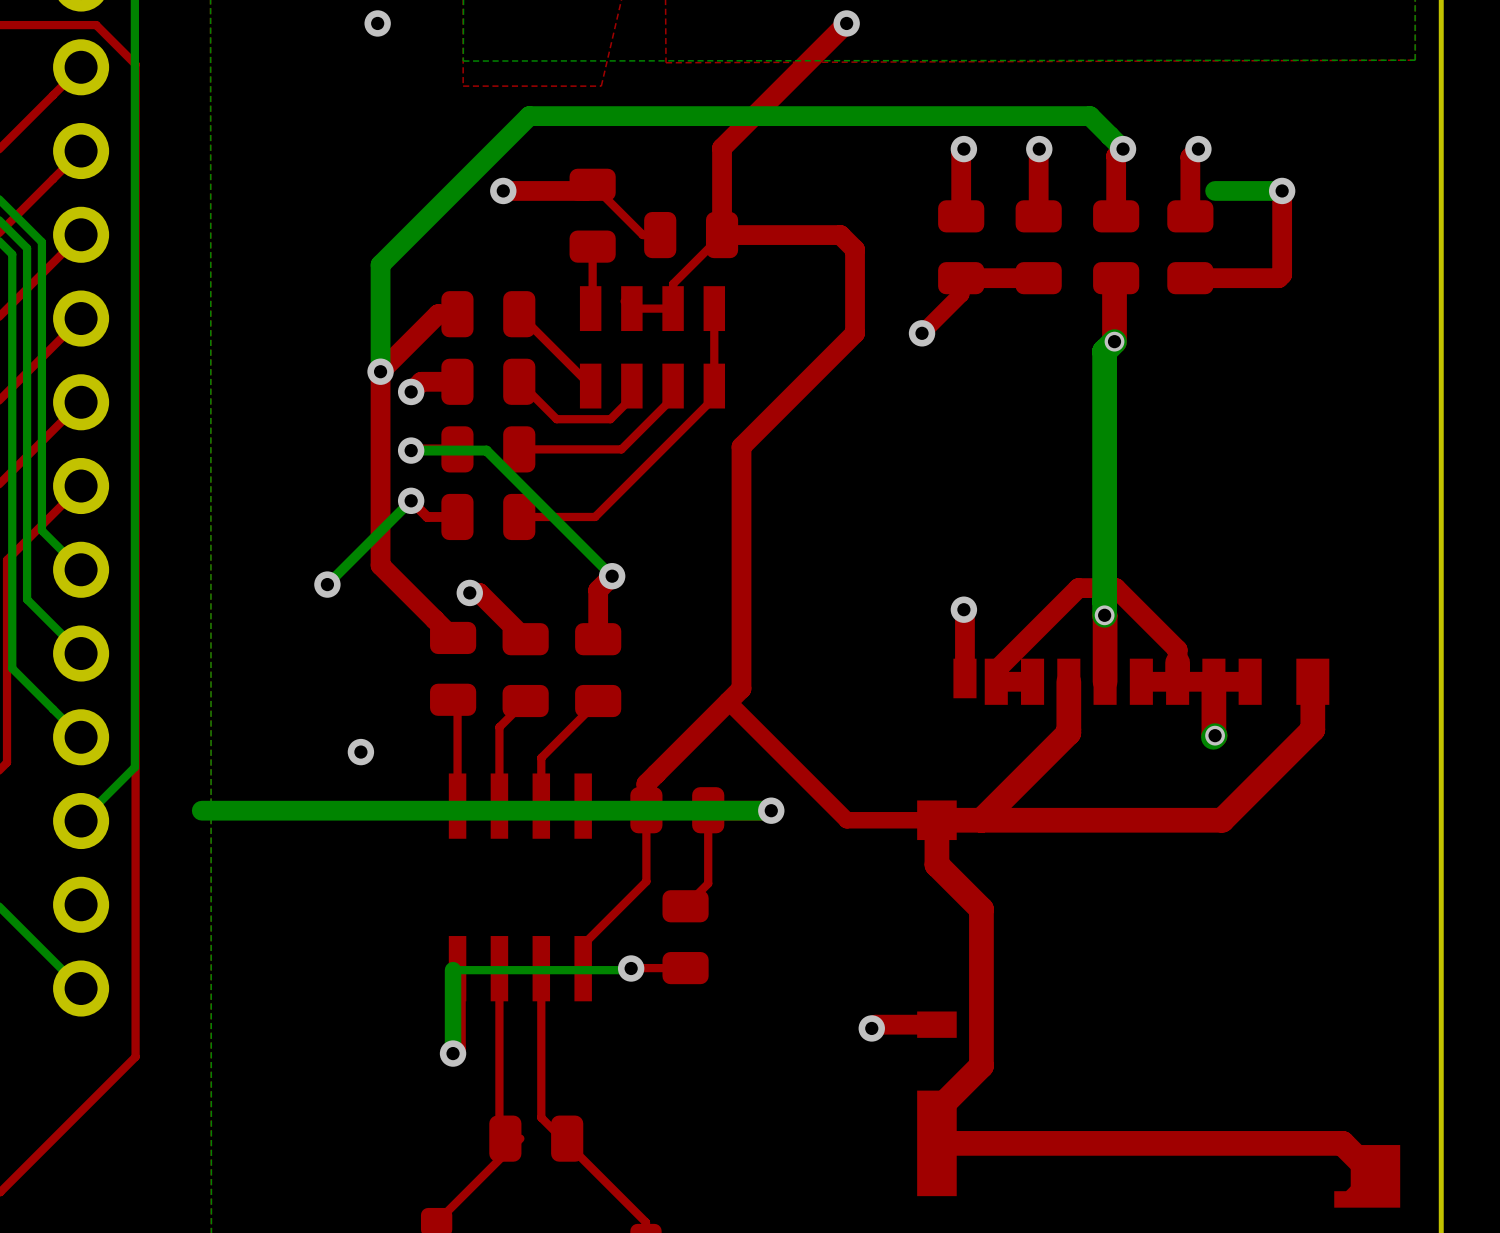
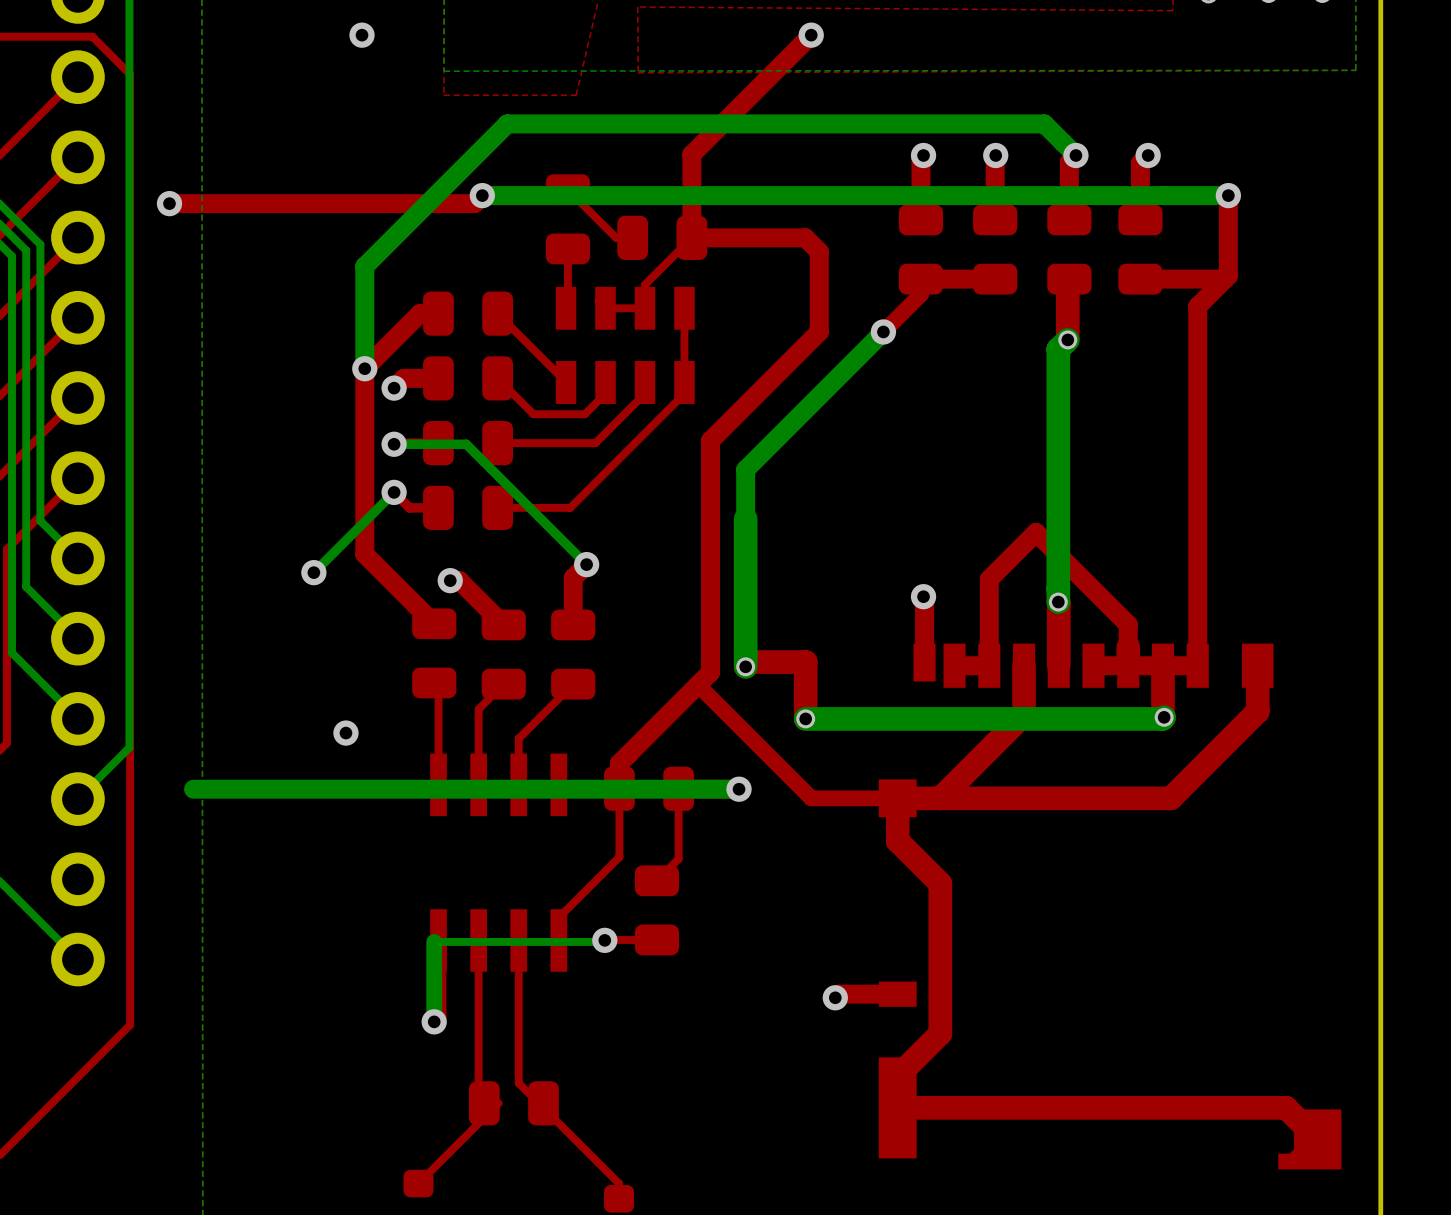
top track: none -> (482, 195) (474, 203) (169, 203)
bottom track: none -> (1164, 195) (482, 195)
via: none -> (169, 203)
top track: none -> (1225, 279) (1197, 306) (1197, 665)
bottom track: none -> (883, 331) (745, 469) (745, 666)
top track: (1177, 649) (1115, 588) (1078, 588) (996, 670) (996, 681) -> (1128, 635) (1128, 624) (1036, 532) (989, 579) (989, 665)
top track: none -> (745, 666) (750, 662) (805, 662) (805, 718)
via: none -> (745, 666)
via: none -> (805, 718)
bottom track: none -> (1162, 718) (805, 718)

